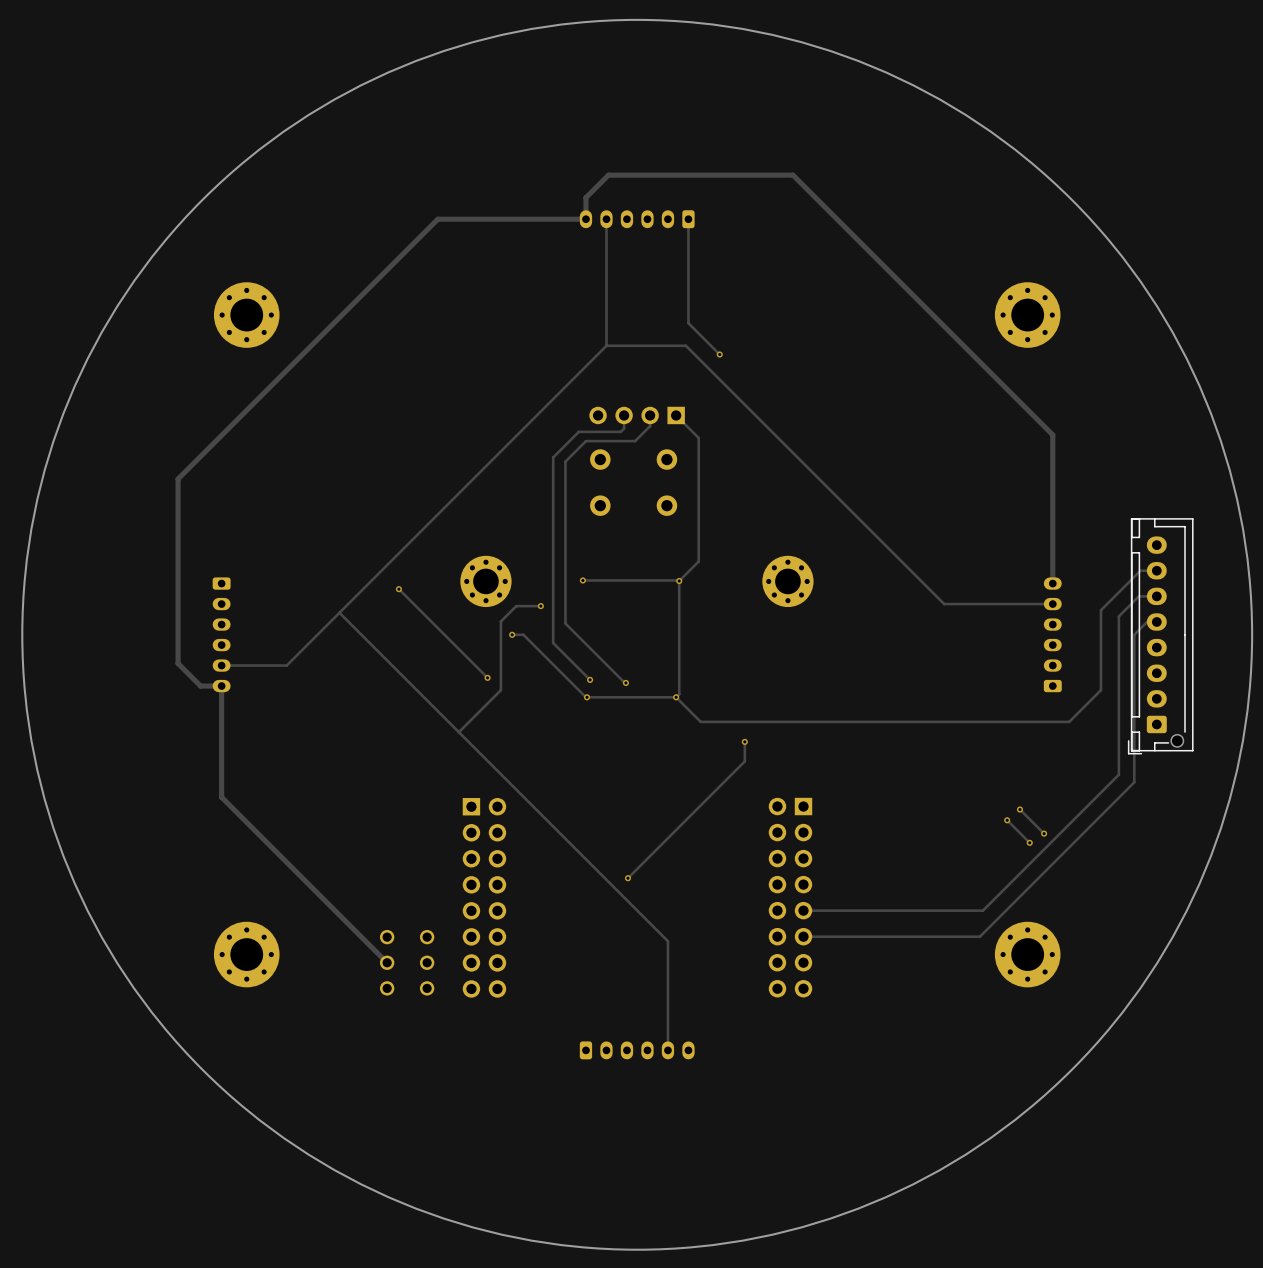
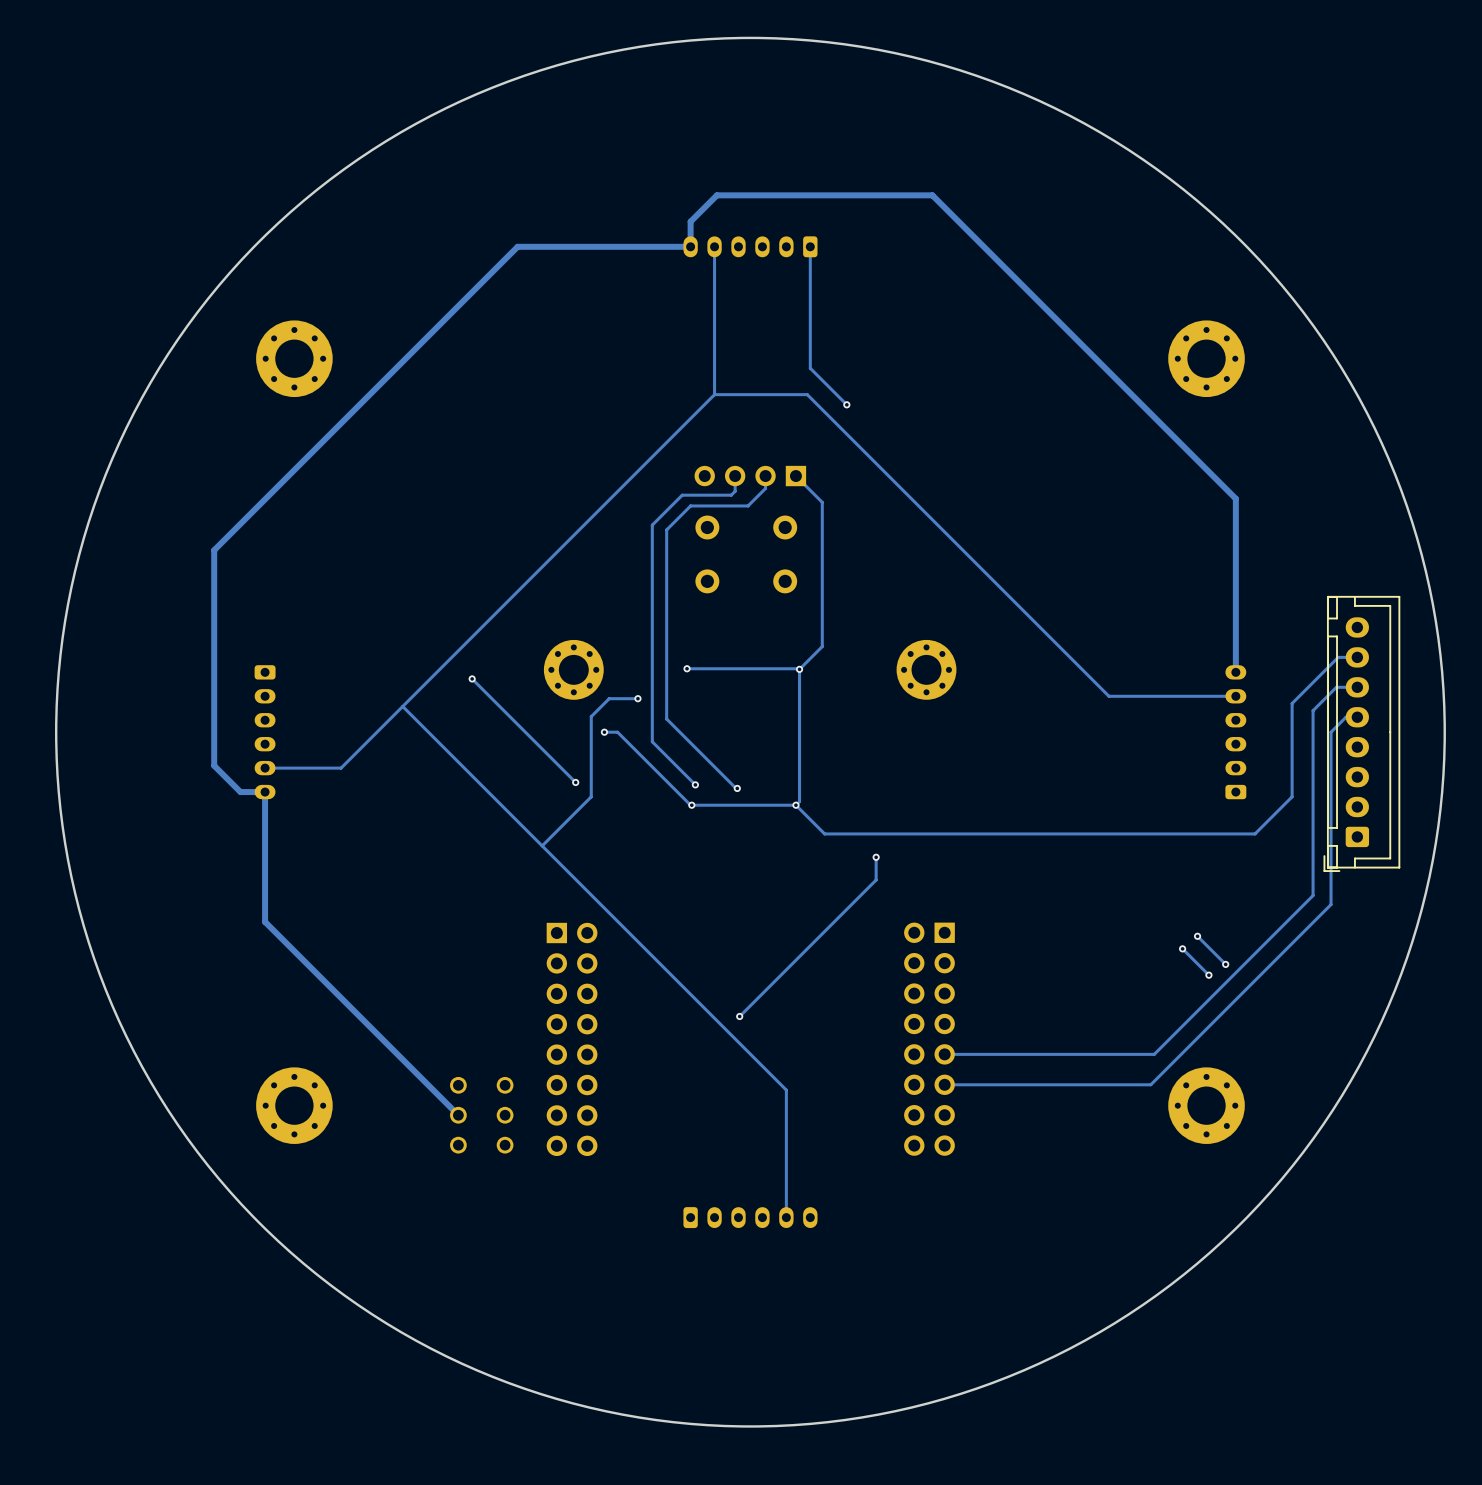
round board edge size: [21, 18, 1254, 1251] -> [55, 36, 1446, 1428]
part footprint: [1128, 518, 1194, 755] -> [1323, 596, 1401, 872]

